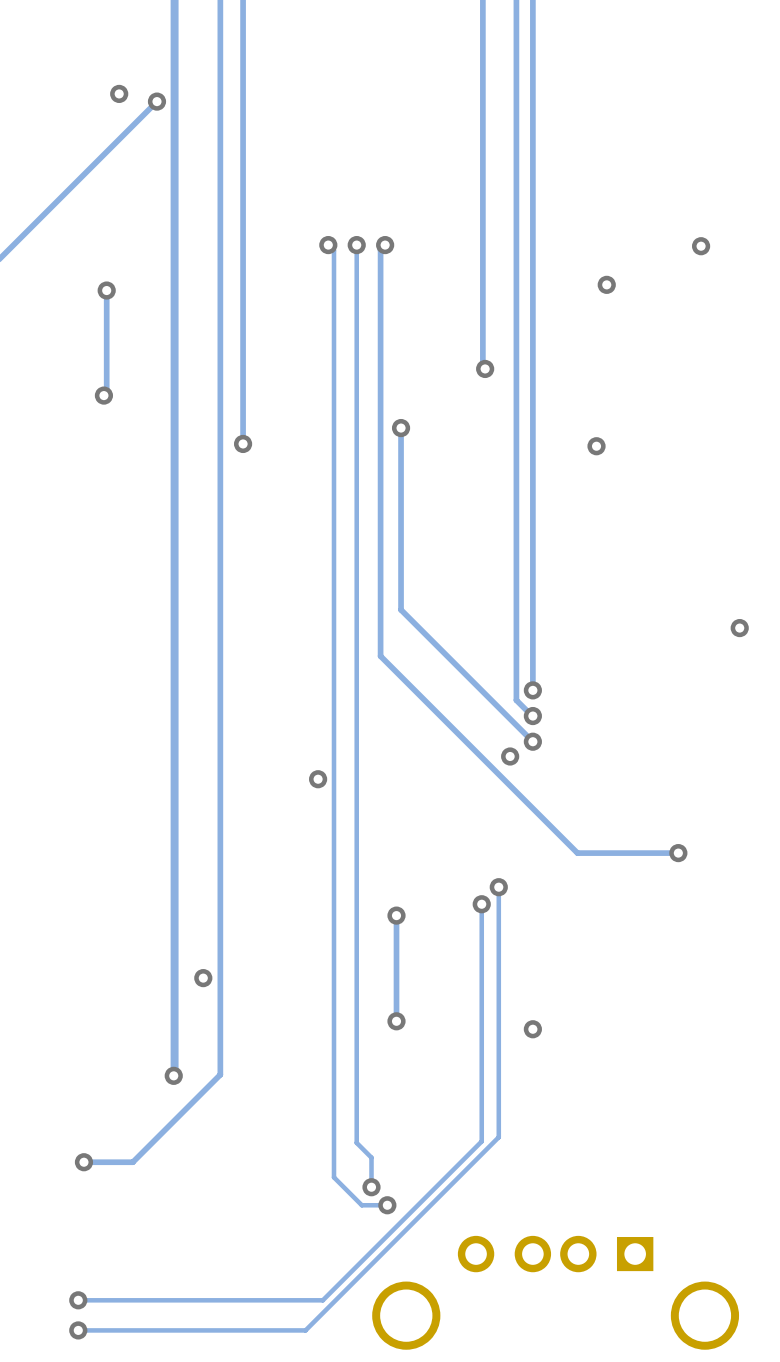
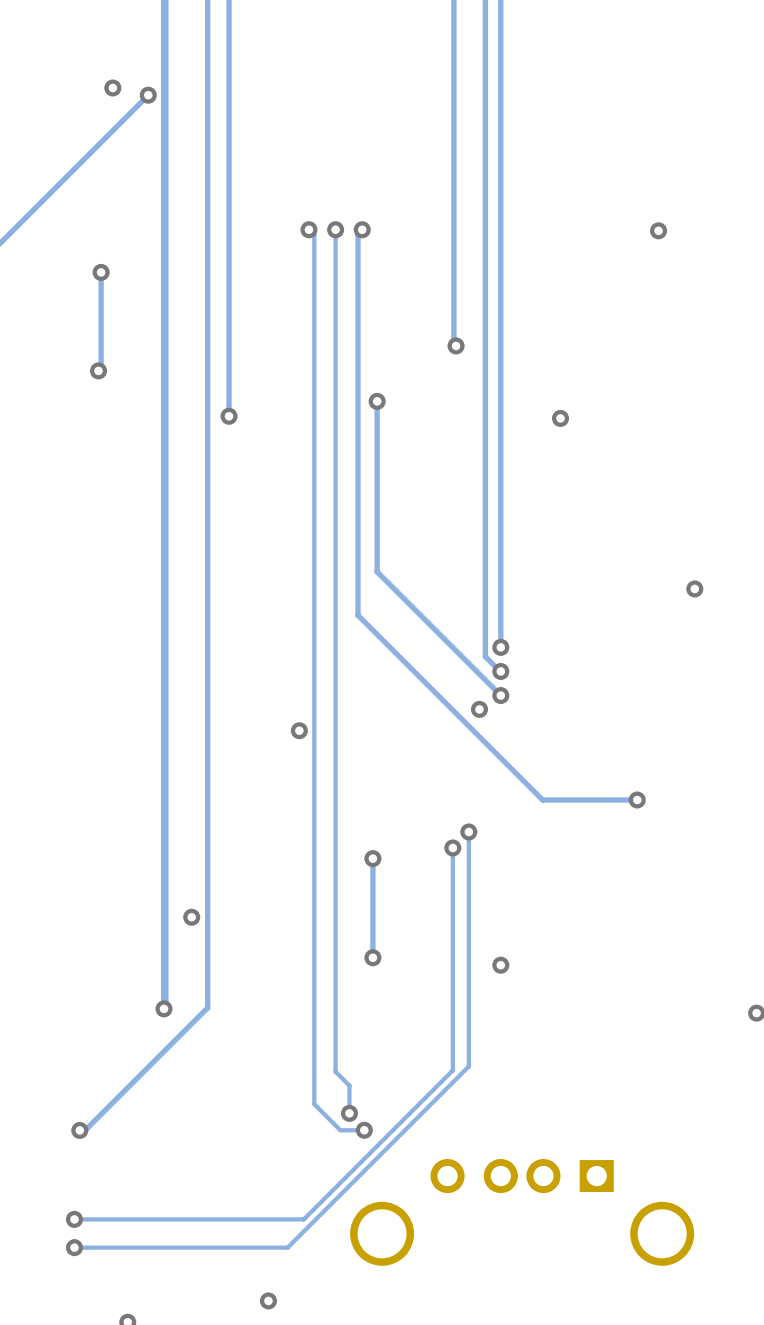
via: (606, 284) -> none
via position: (83, 1162) -> (79, 1130)
track: (132, 1162) (83, 1162) -> (125, 1089) (85, 1130) (79, 1130)

